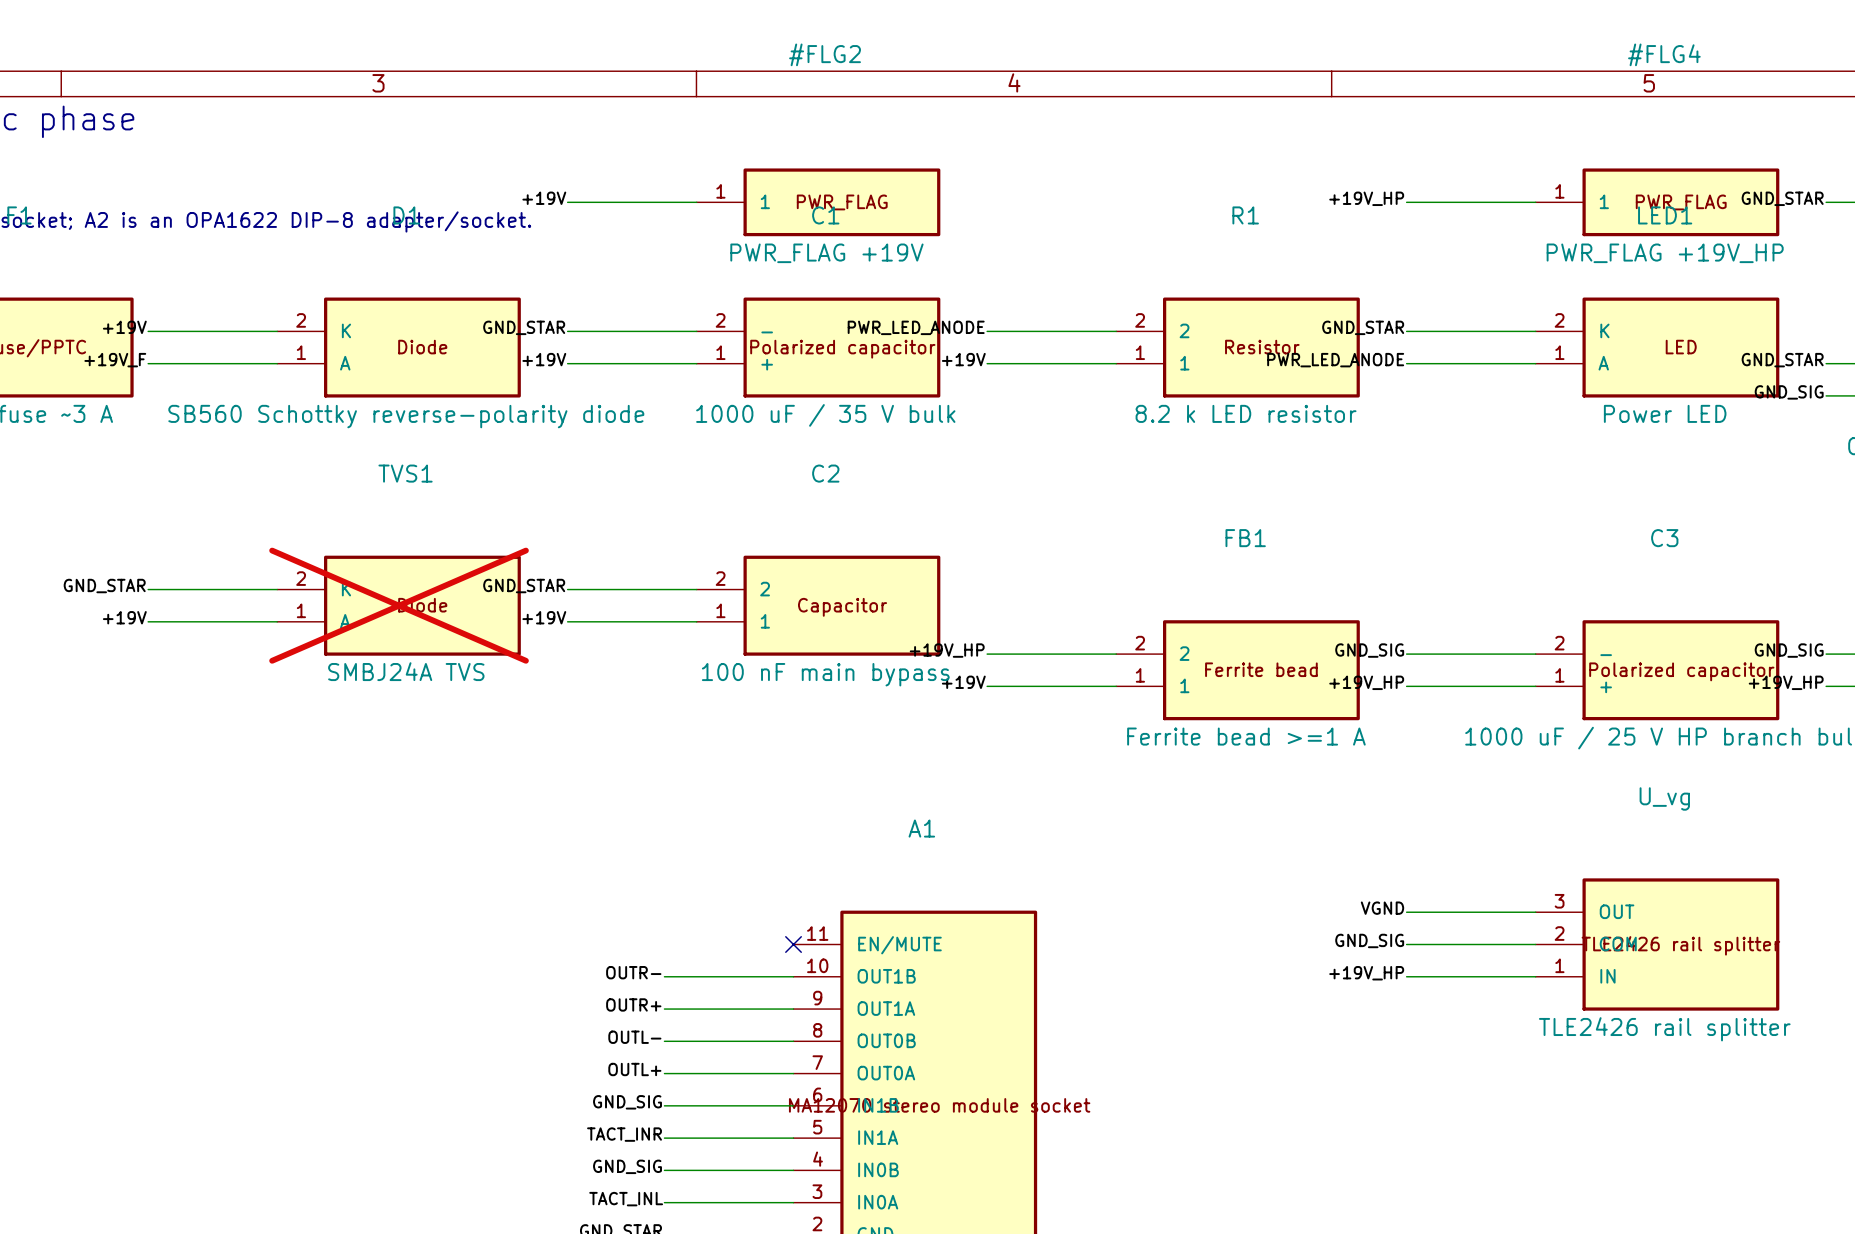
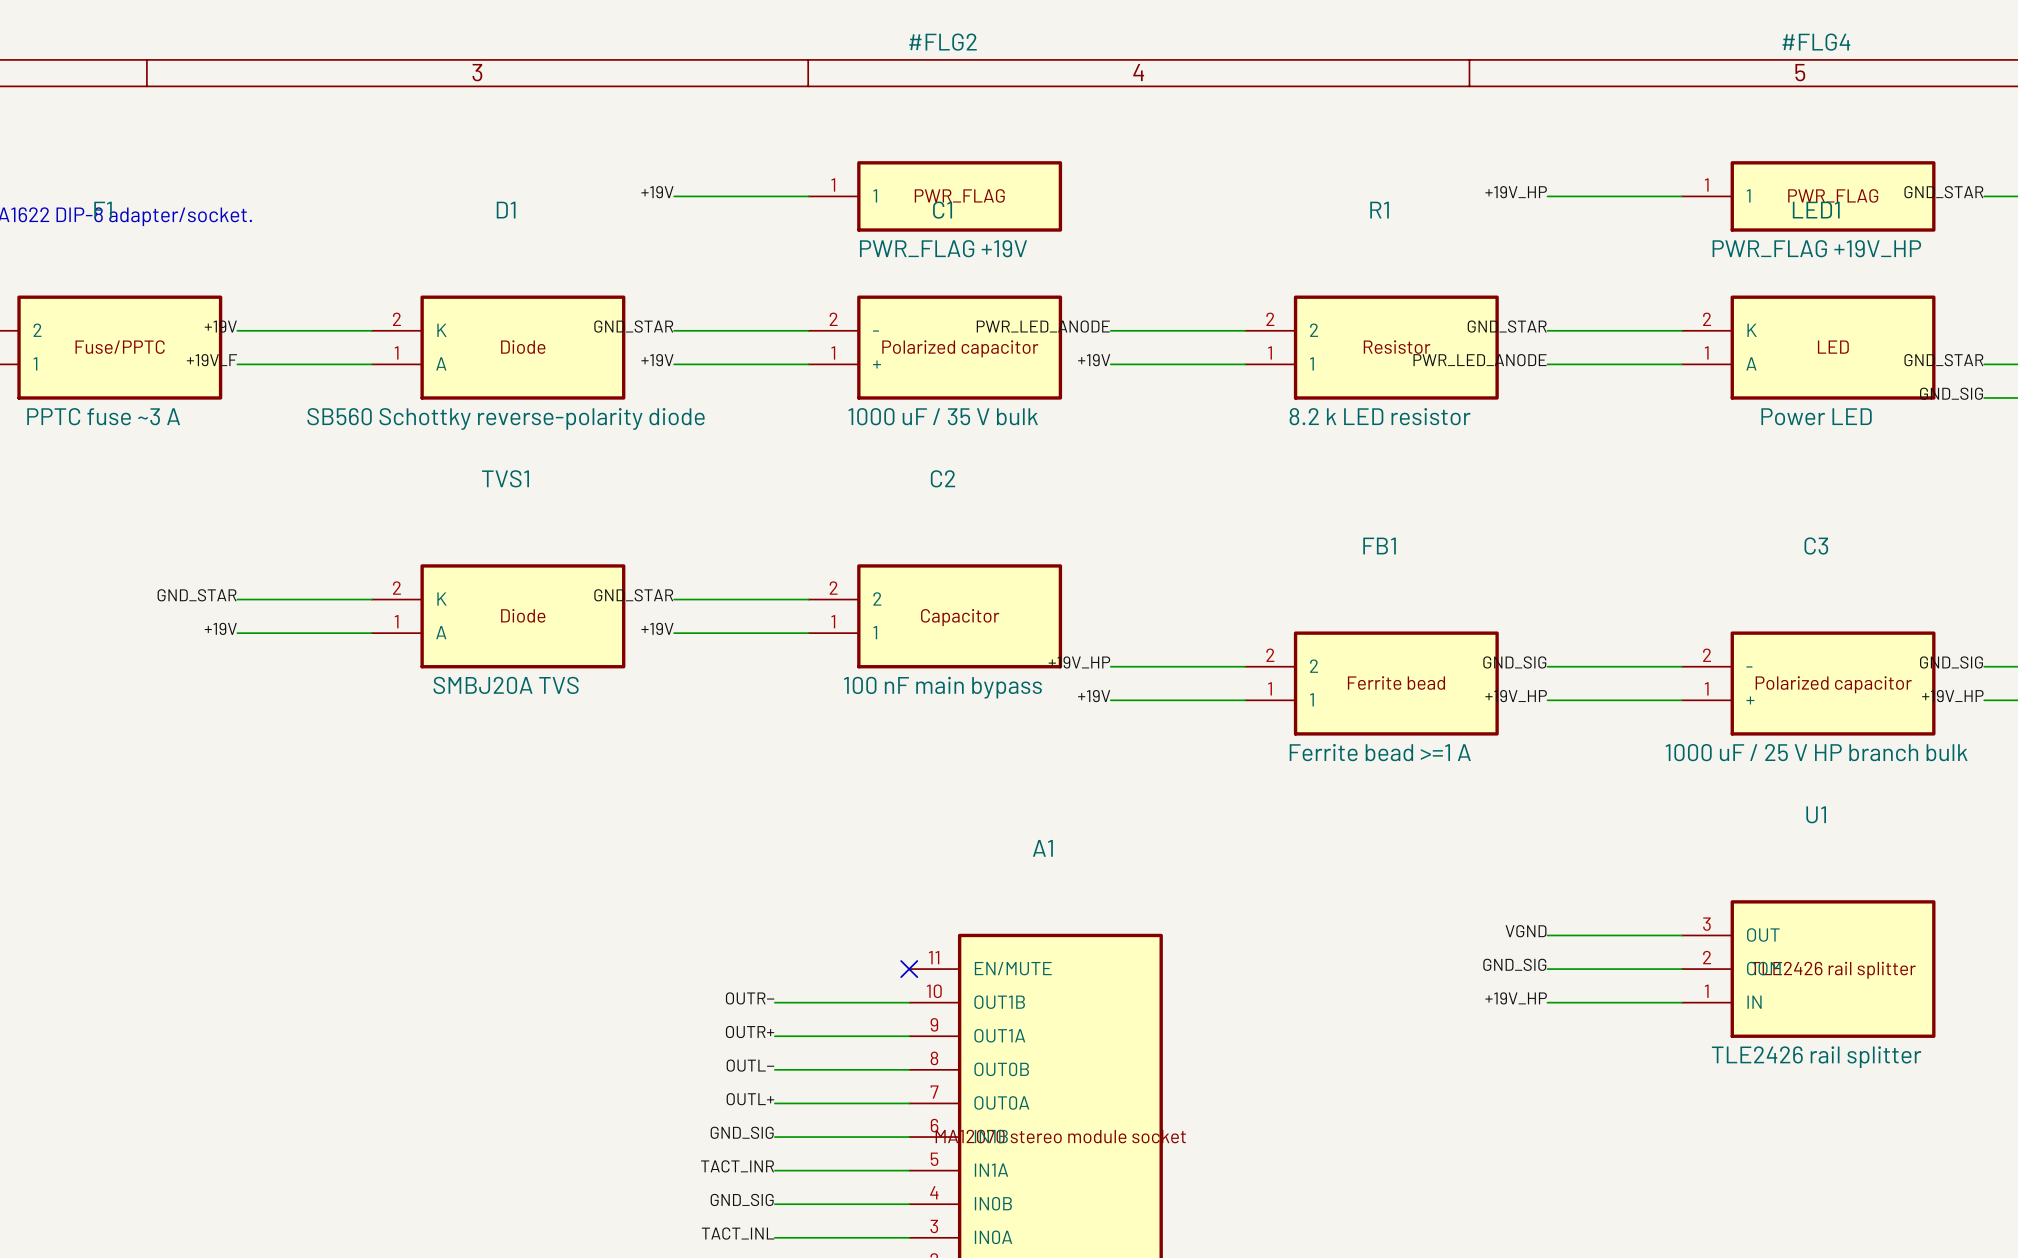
TVS1 do-not-place cross: (399, 605) -> none
TVS1 value: SMBJ24A TVS (406, 671) -> SMBJ20A TVS (506, 685)
U_vg name: U_vg (1664, 798) -> U1 (1816, 814)

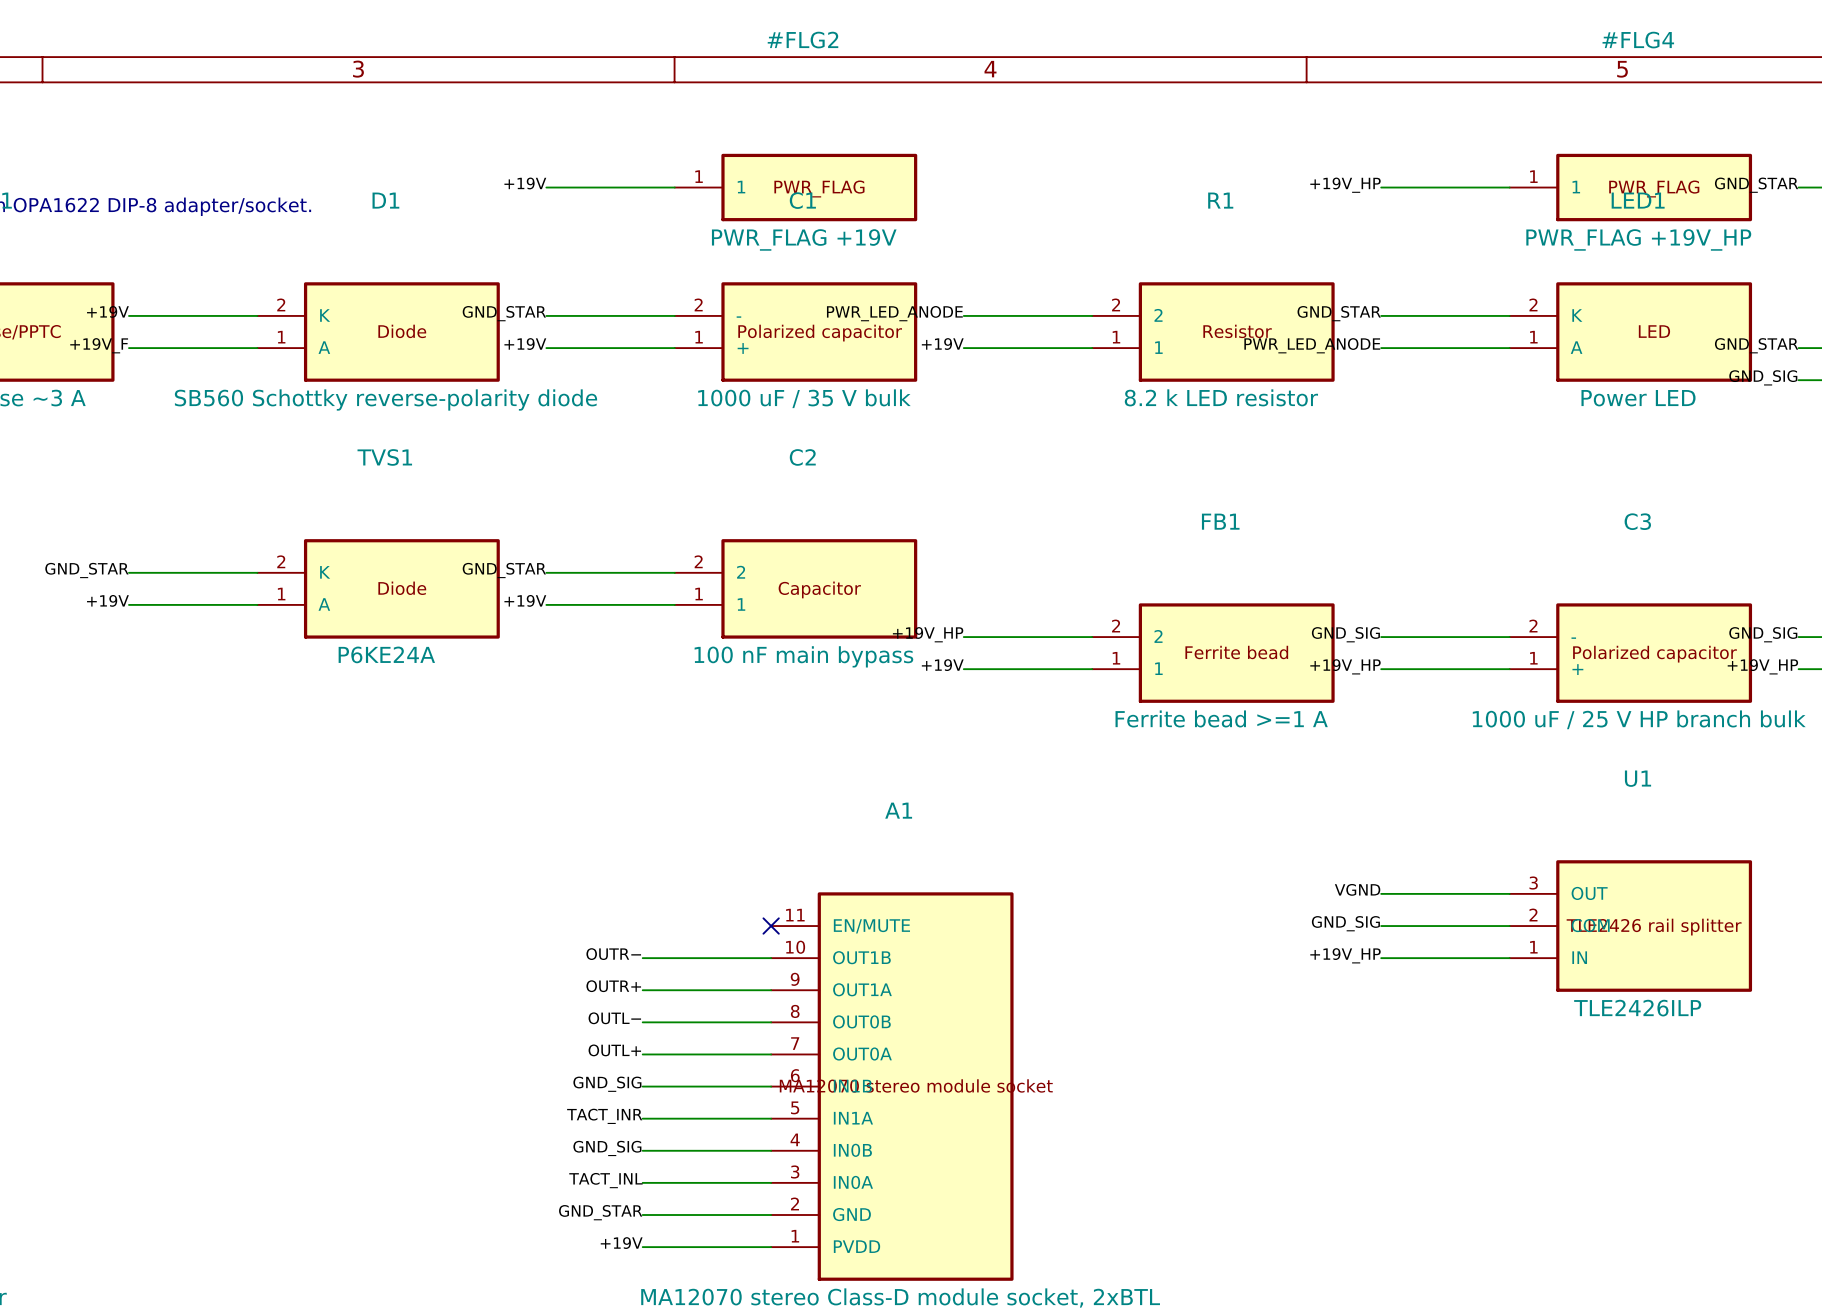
TVS1 value: SMBJ20A TVS (506, 685) -> P6KE24A (386, 654)
U1 value: TLE2426 rail splitter (1816, 1057) -> TLE2426ILP (1637, 1008)

